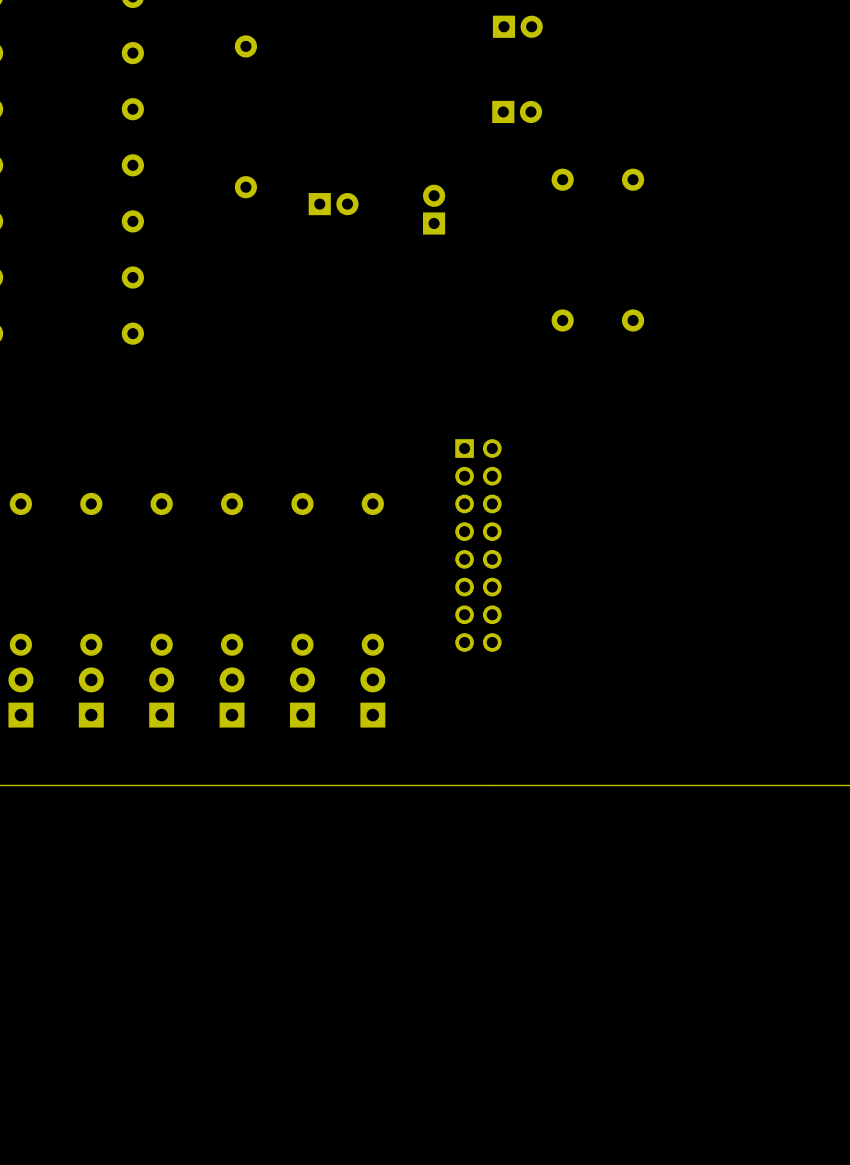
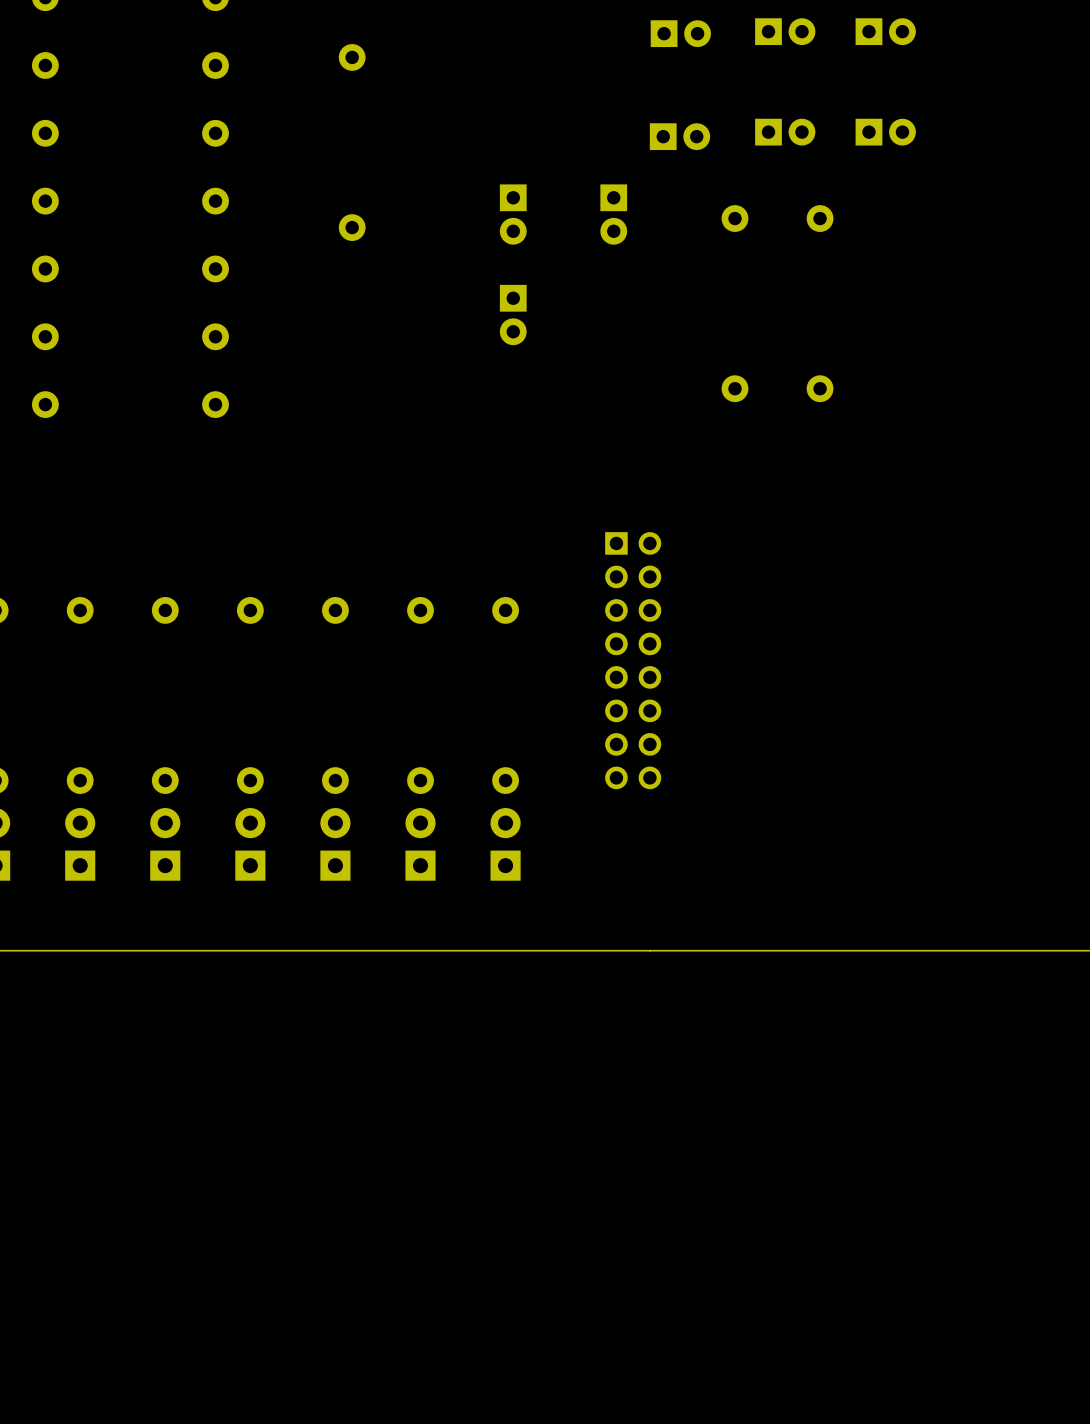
part: none -> (785, 31)
part: none -> (885, 31)
part: none -> (785, 132)
part: none -> (885, 132)
part: none -> (513, 214)
part: none -> (613, 214)
part: (333, 204) -> none
part: (434, 209) -> none
part: none -> (513, 315)

